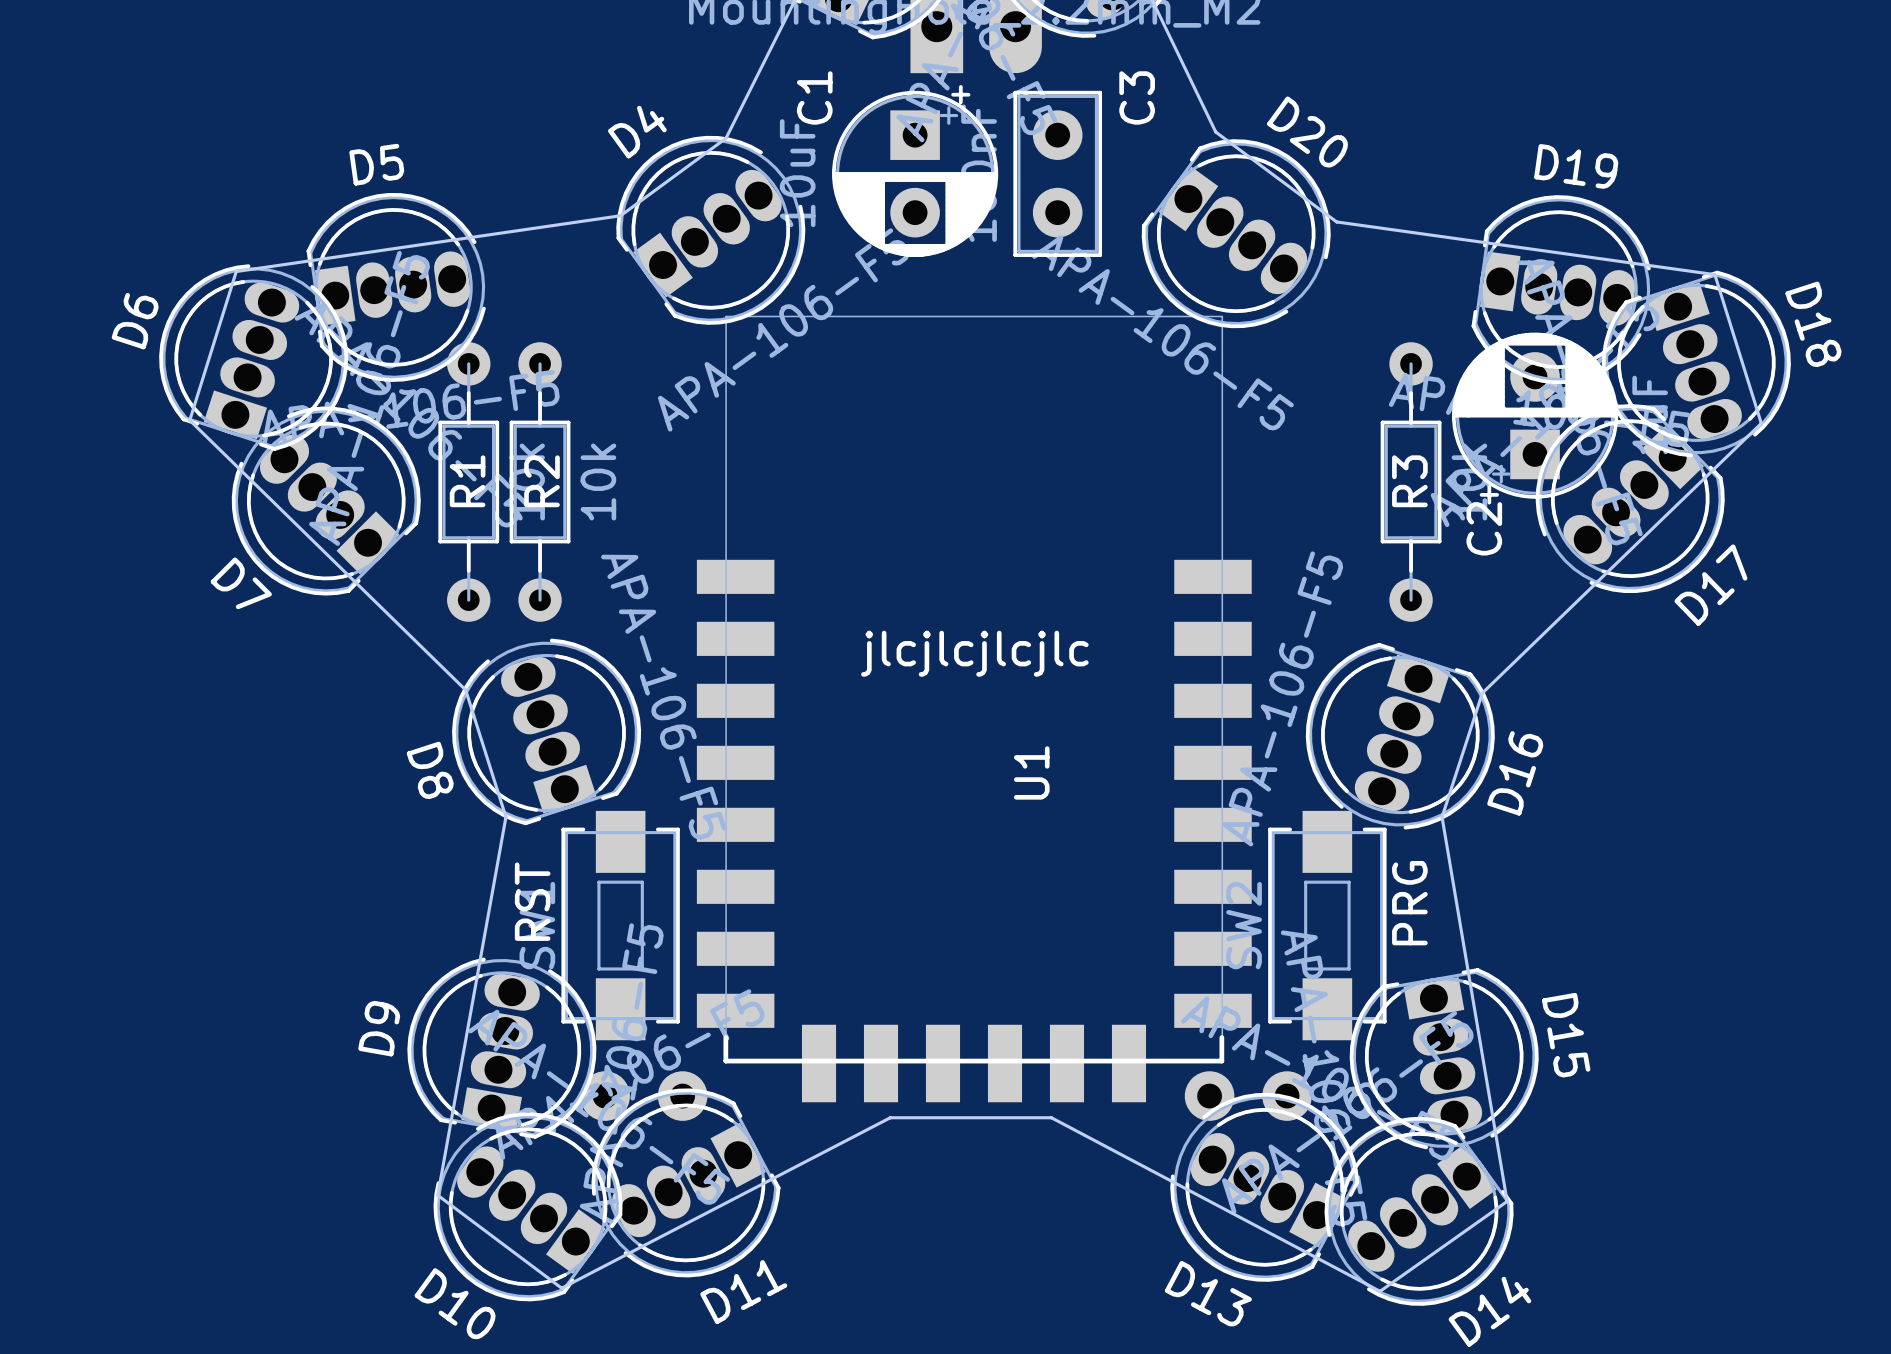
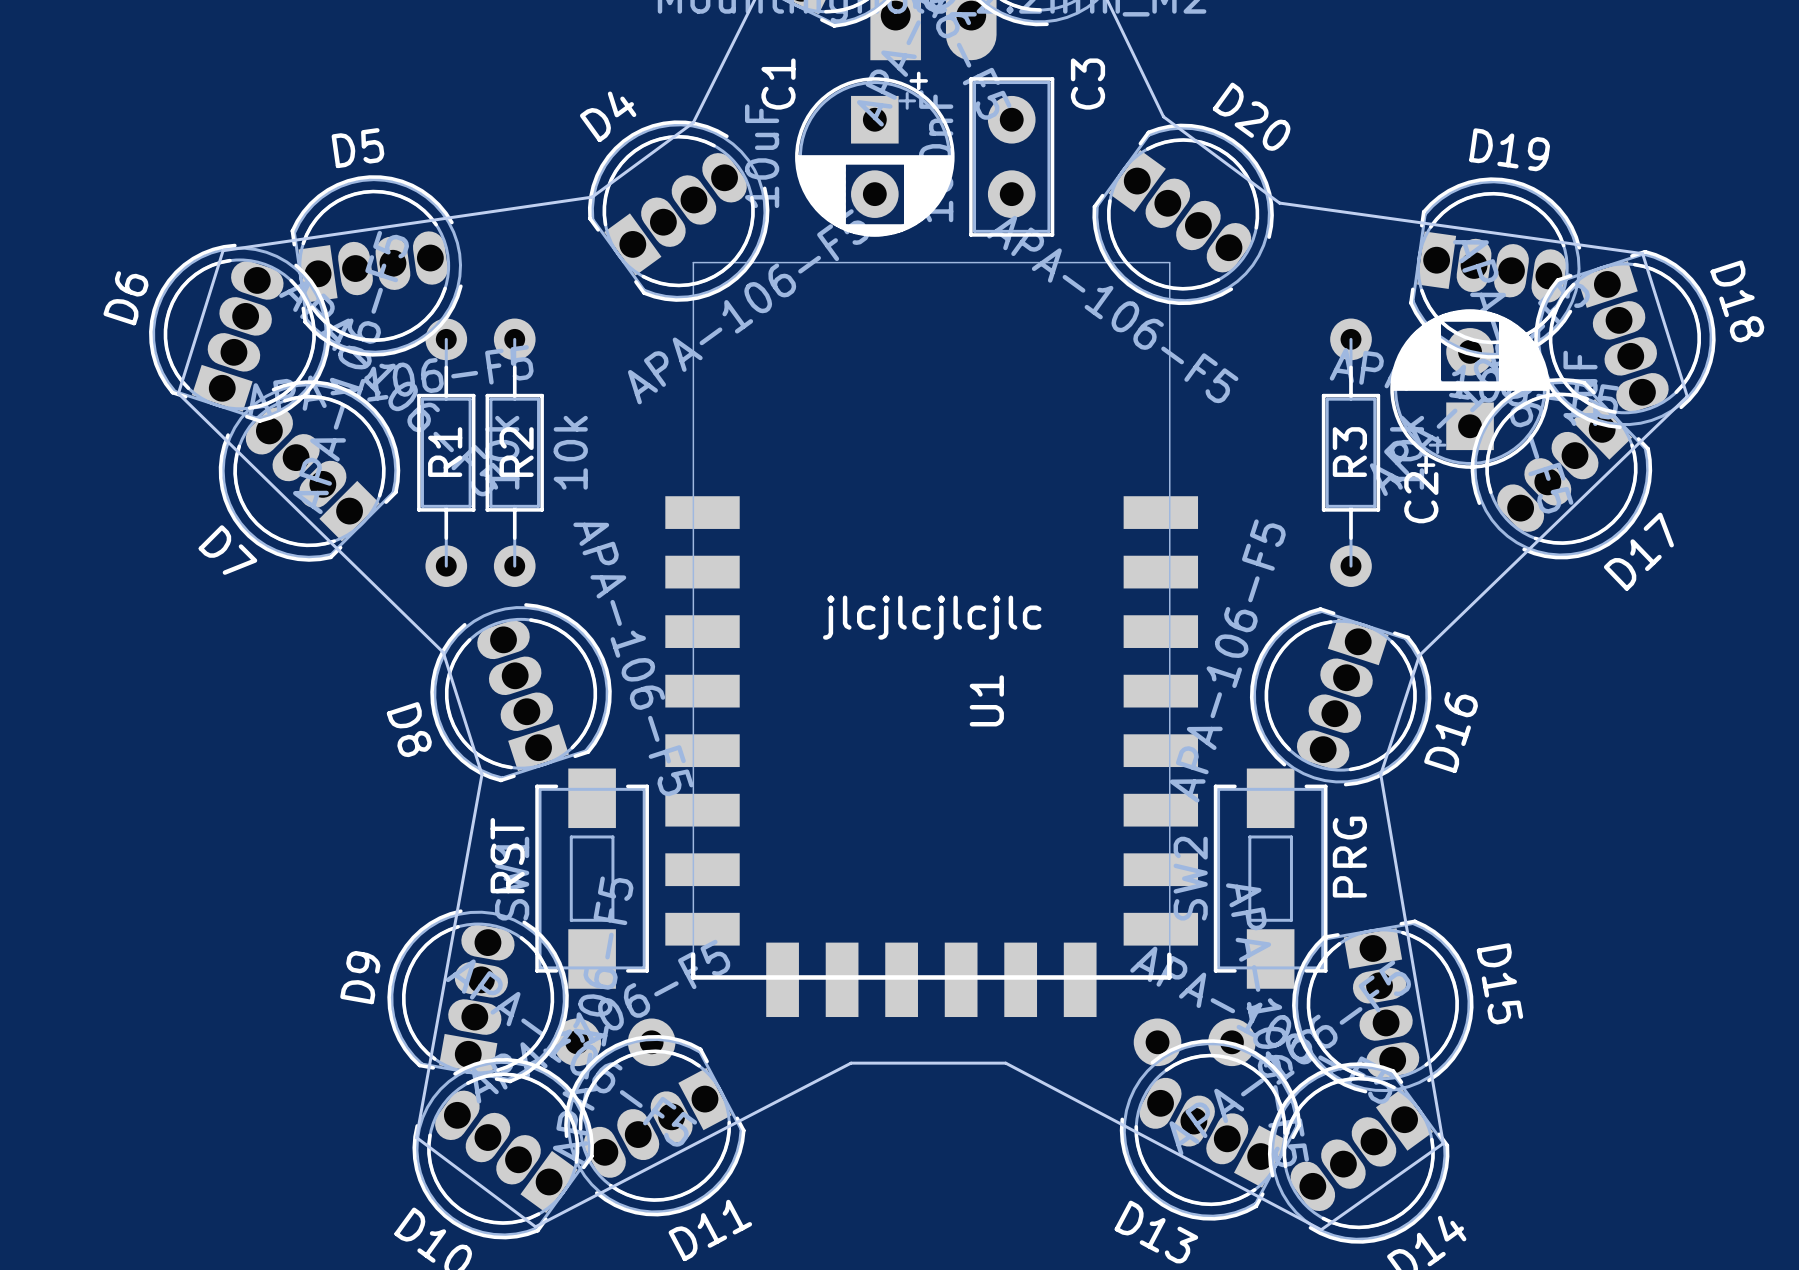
U1 position: (974, 708) -> (931, 639)

